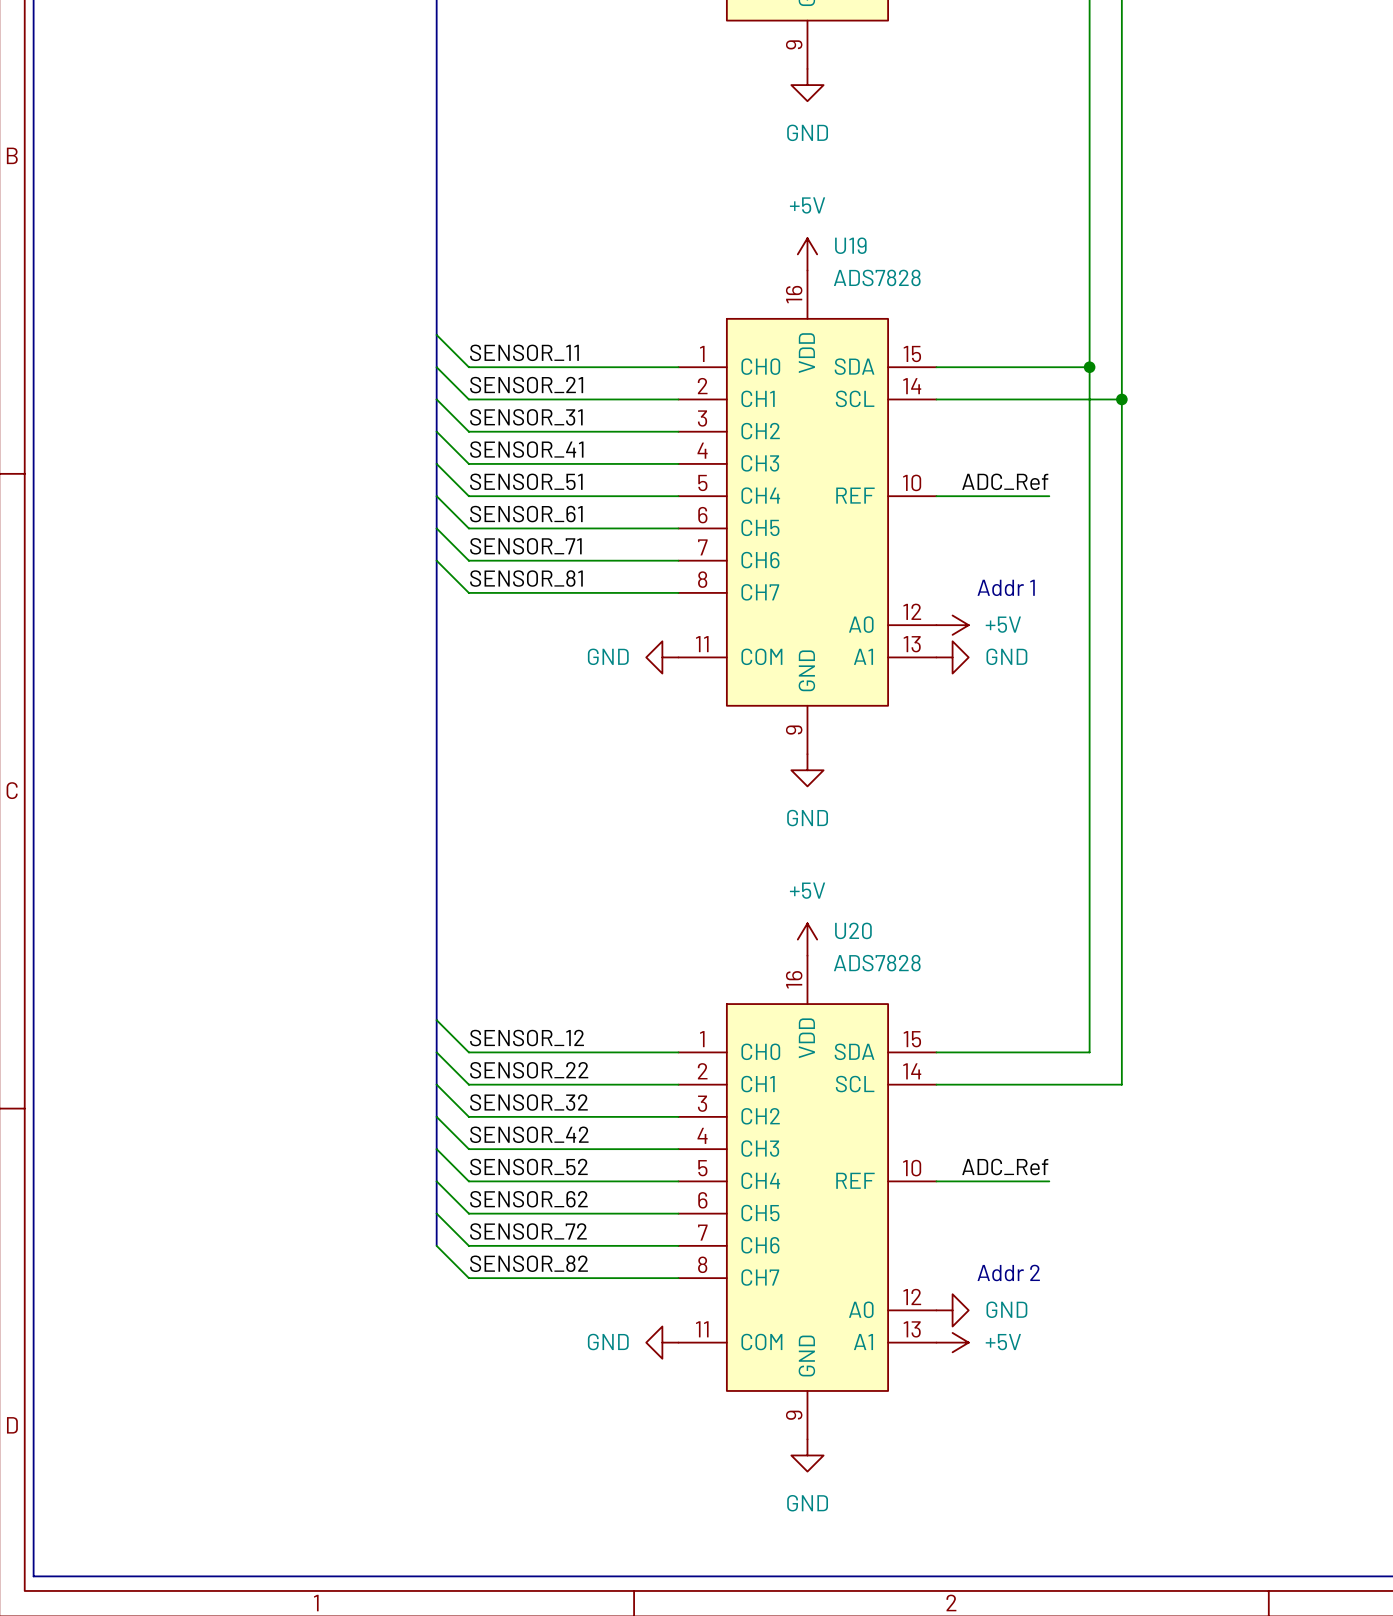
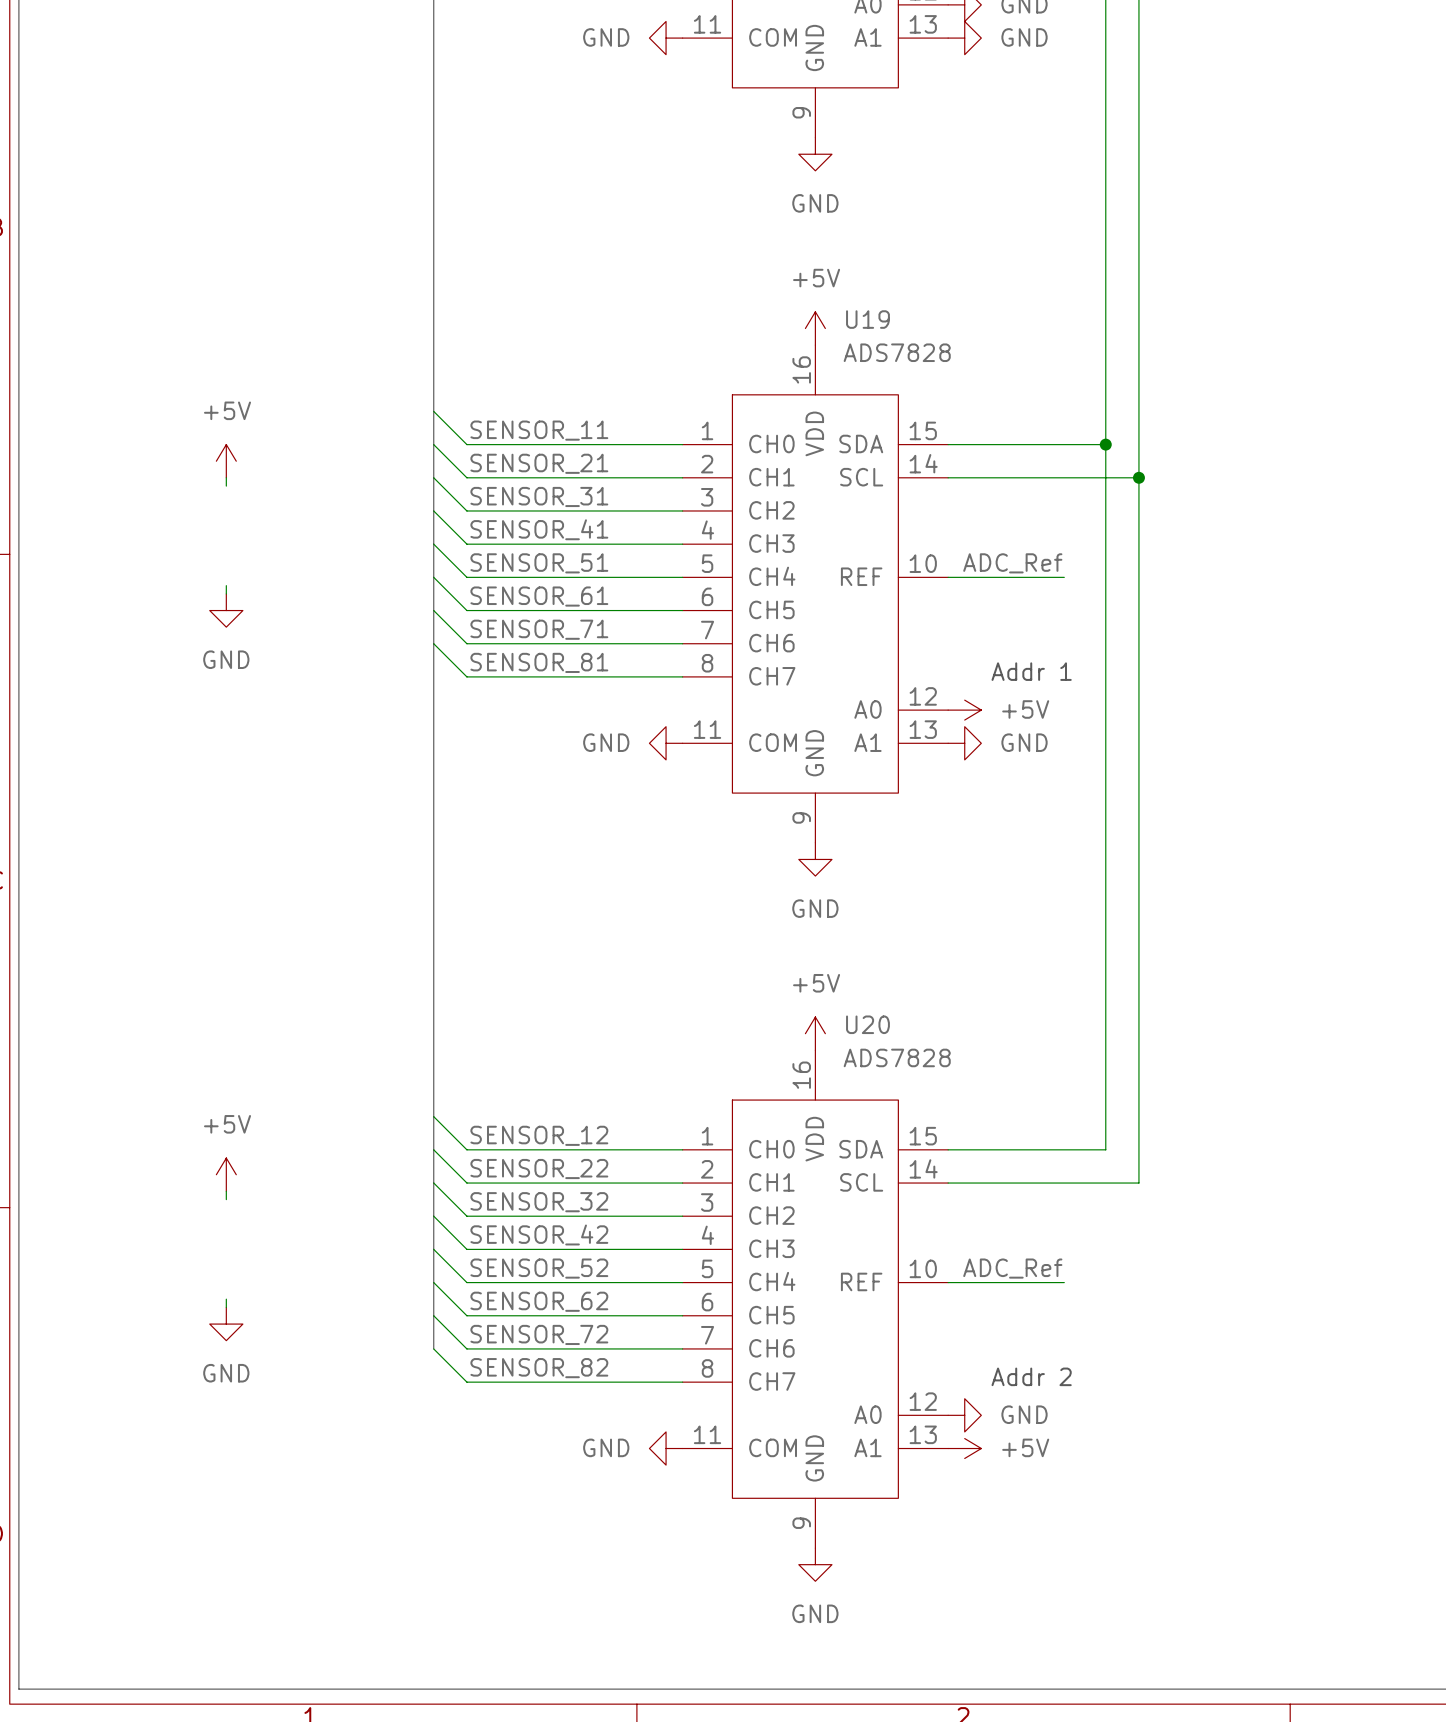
power symbol: none -> +5V (226, 461)
wire: none -> (226, 477) (226, 486)
wire: none -> (226, 585) (226, 593)
power symbol: none -> GND (226, 610)
power symbol: none -> +5V (226, 1174)
wire: none -> (226, 1191) (226, 1199)
wire: none -> (226, 1299) (226, 1307)
power symbol: none -> GND (226, 1324)

